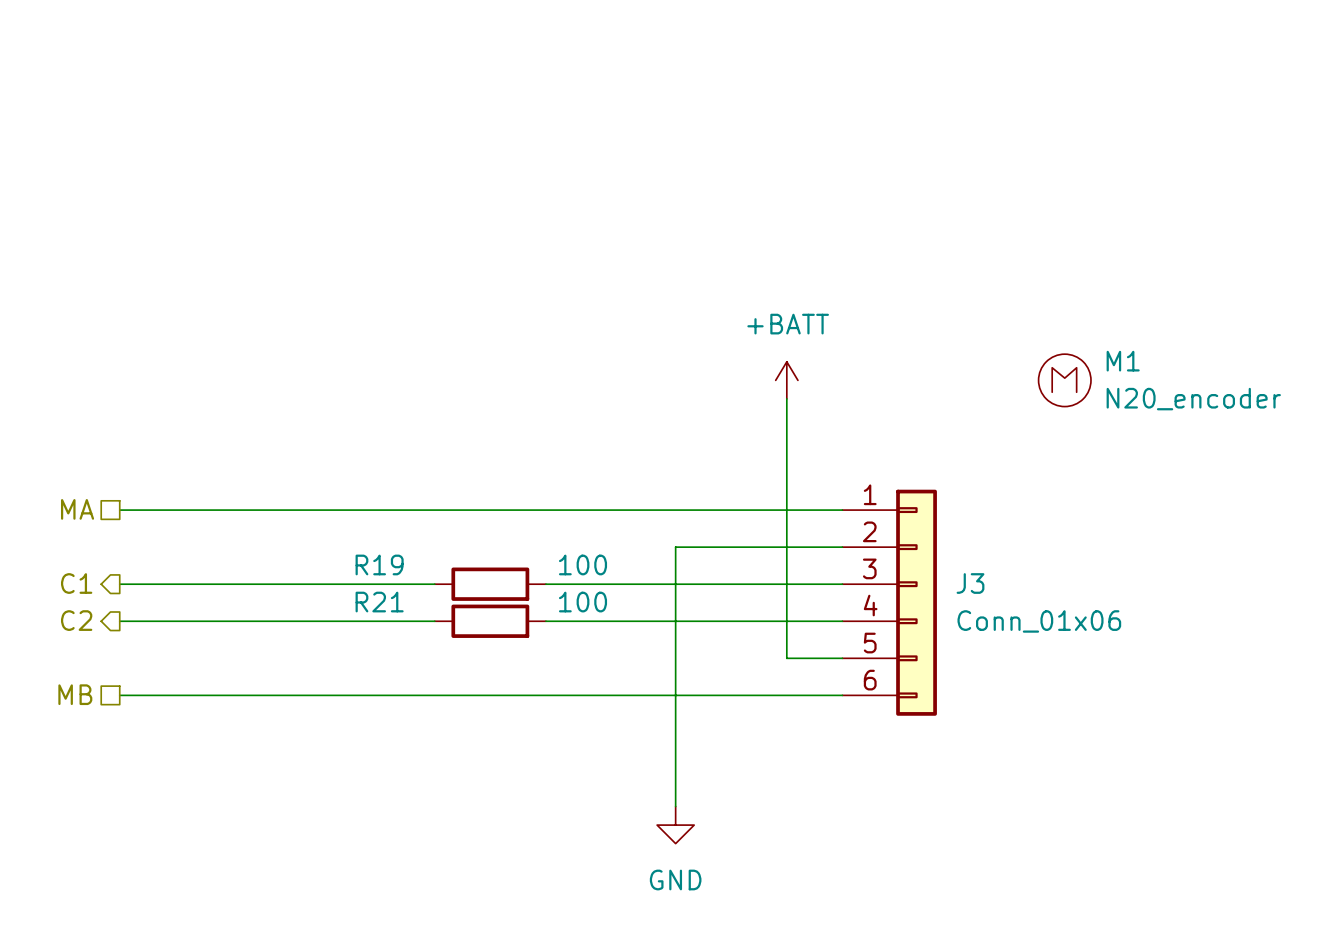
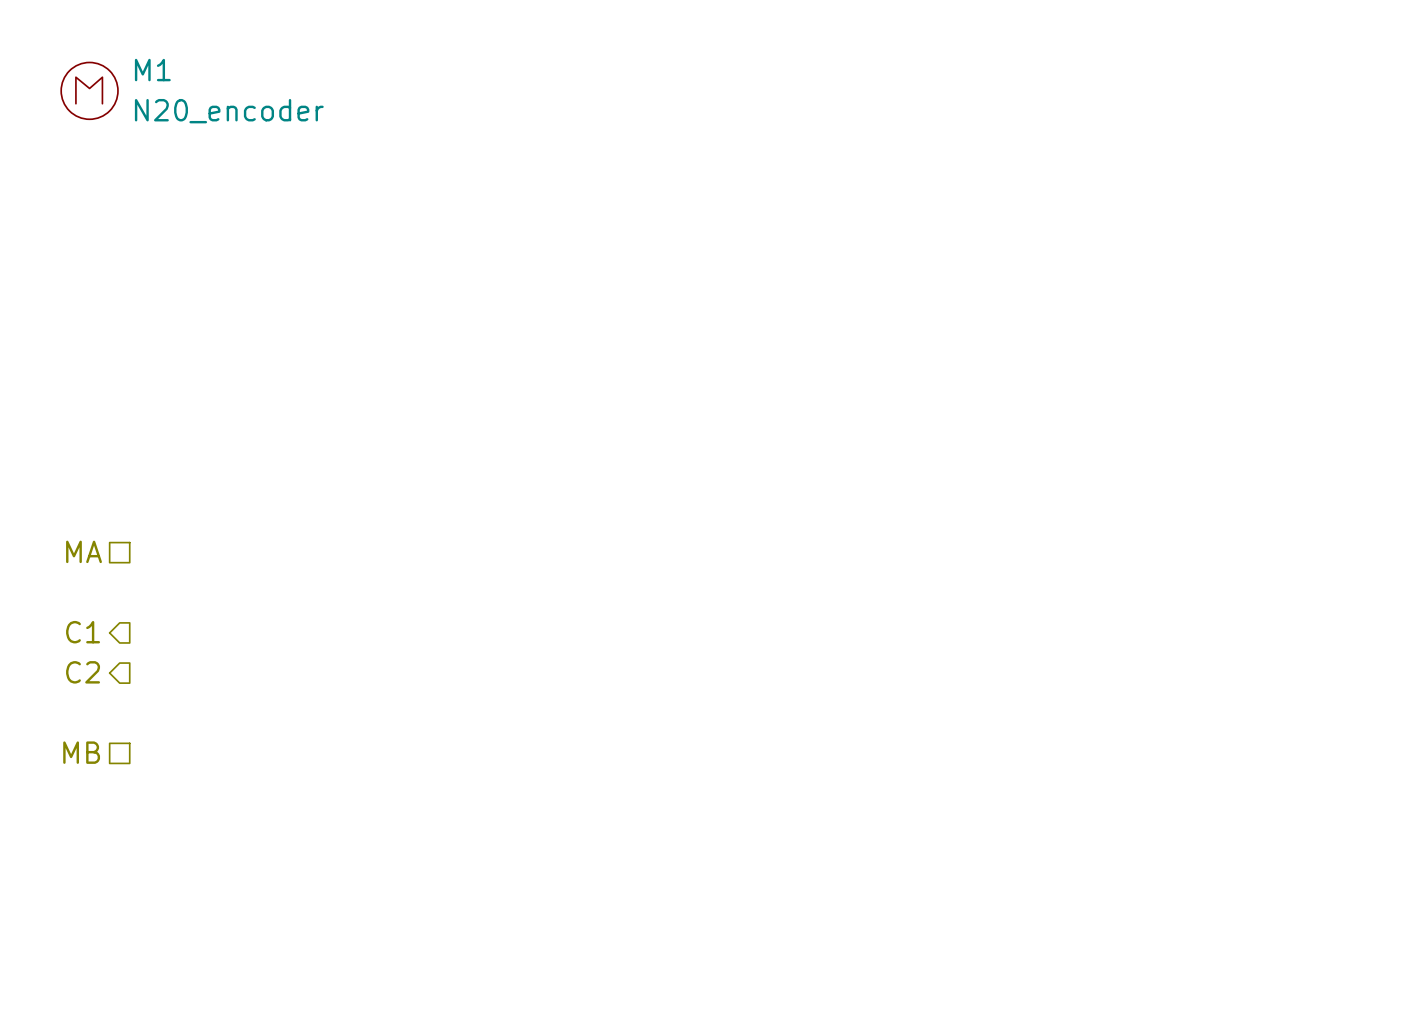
power symbol: +BATT (786, 380) -> none
M1 position: (1064, 380) -> (89, 90)
wire: (786, 398) (786, 658) (842, 658) -> none
wire: (119, 510) (842, 510) -> none
wire: (842, 547) (675, 547) (675, 806) -> none
wire: (119, 584) (434, 584) -> none
R19: 100 (490, 584) -> none
wire: (545, 584) (842, 584) -> none
J3: Conn_01x06 (889, 602) -> none
wire: (119, 621) (434, 621) -> none
R21: 100 (490, 621) -> none
wire: (545, 621) (842, 621) -> none
wire: (119, 695) (842, 695) -> none
power symbol: GND (675, 825) -> none

